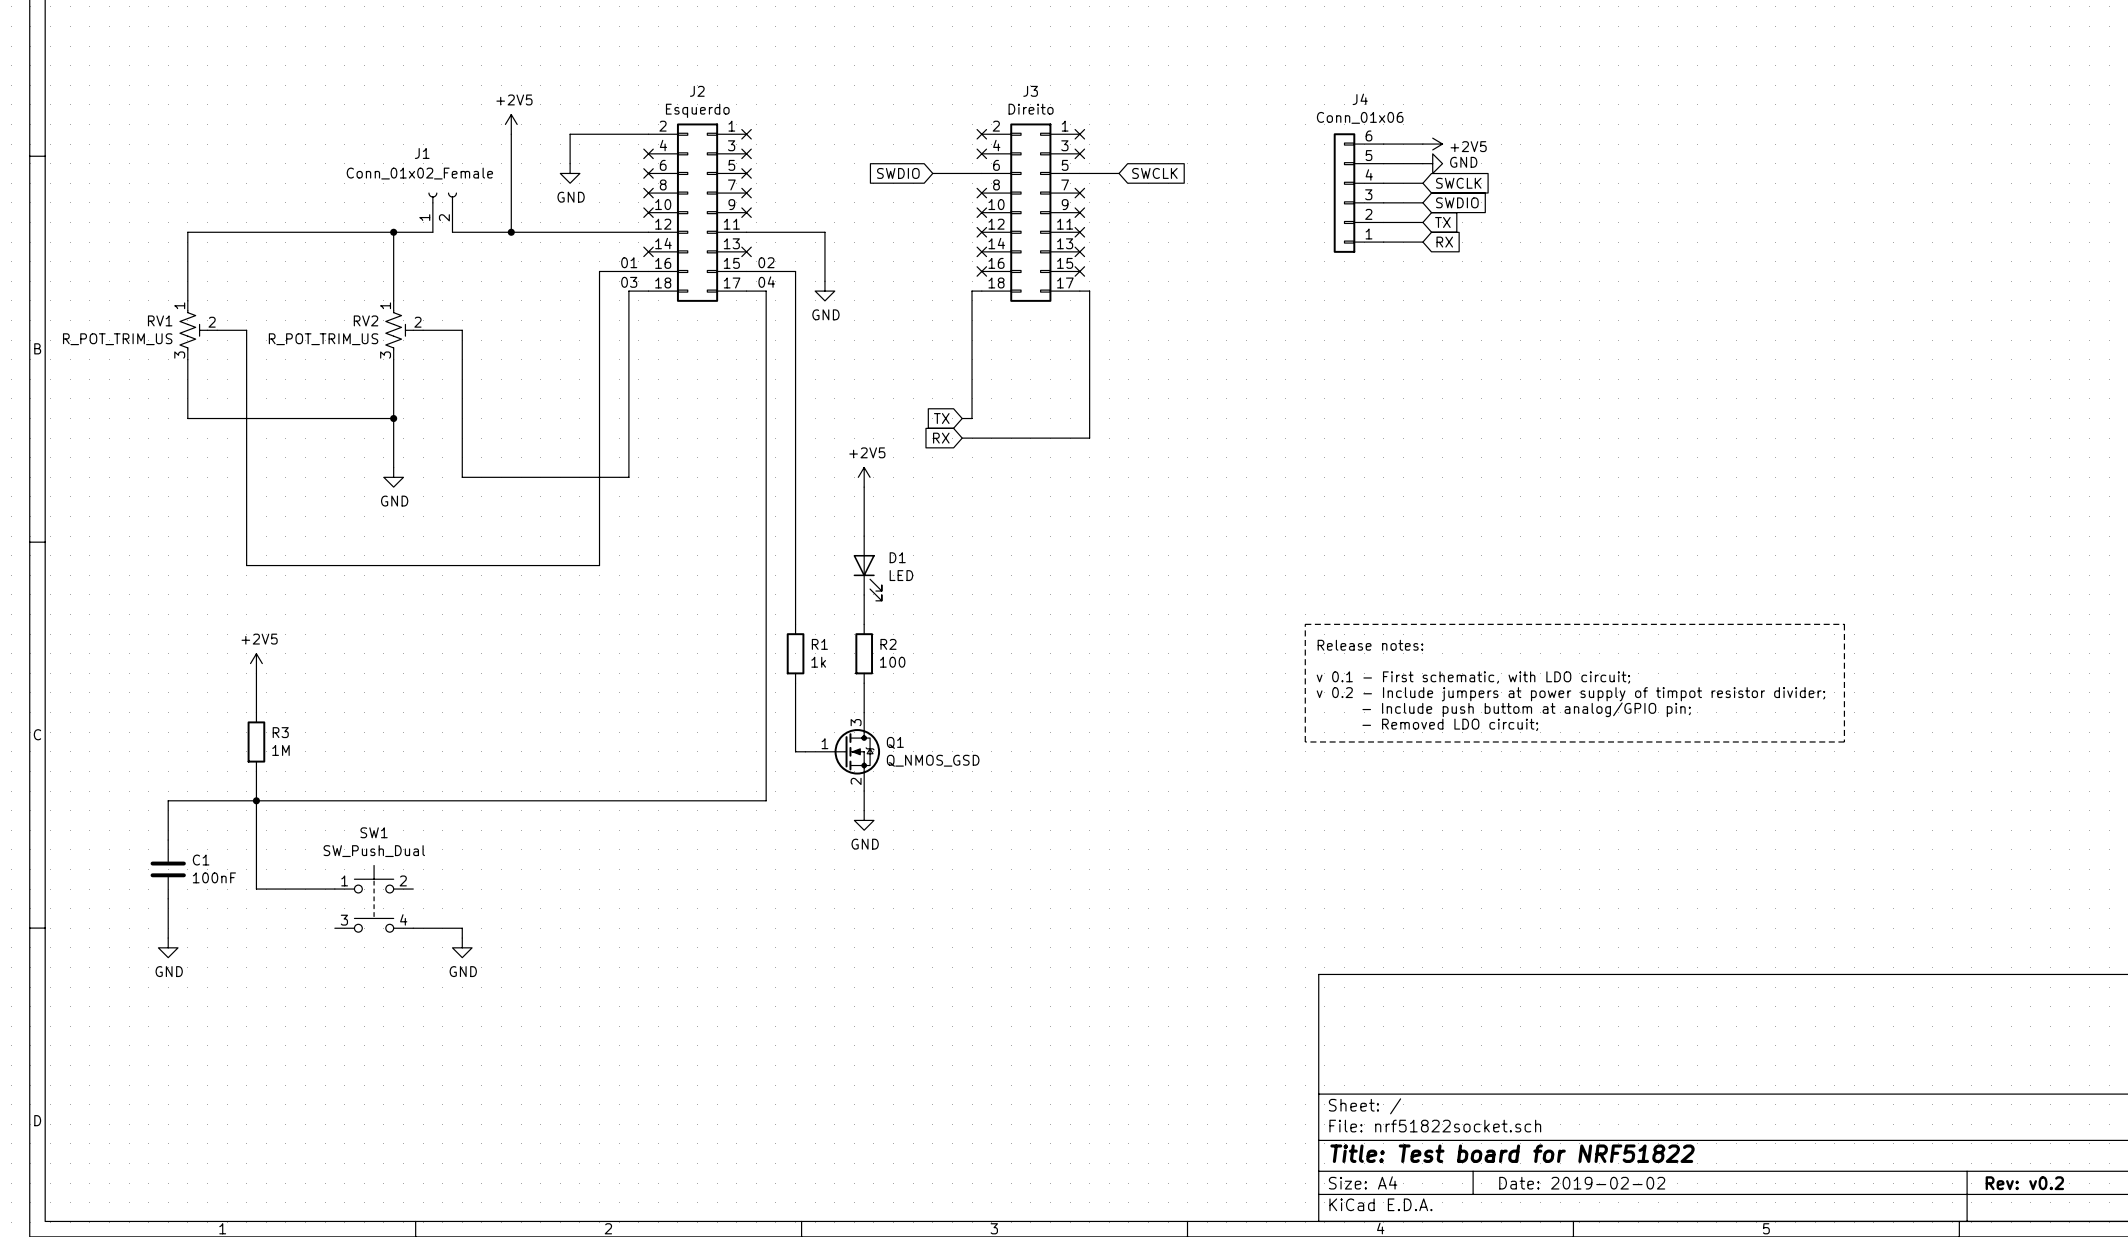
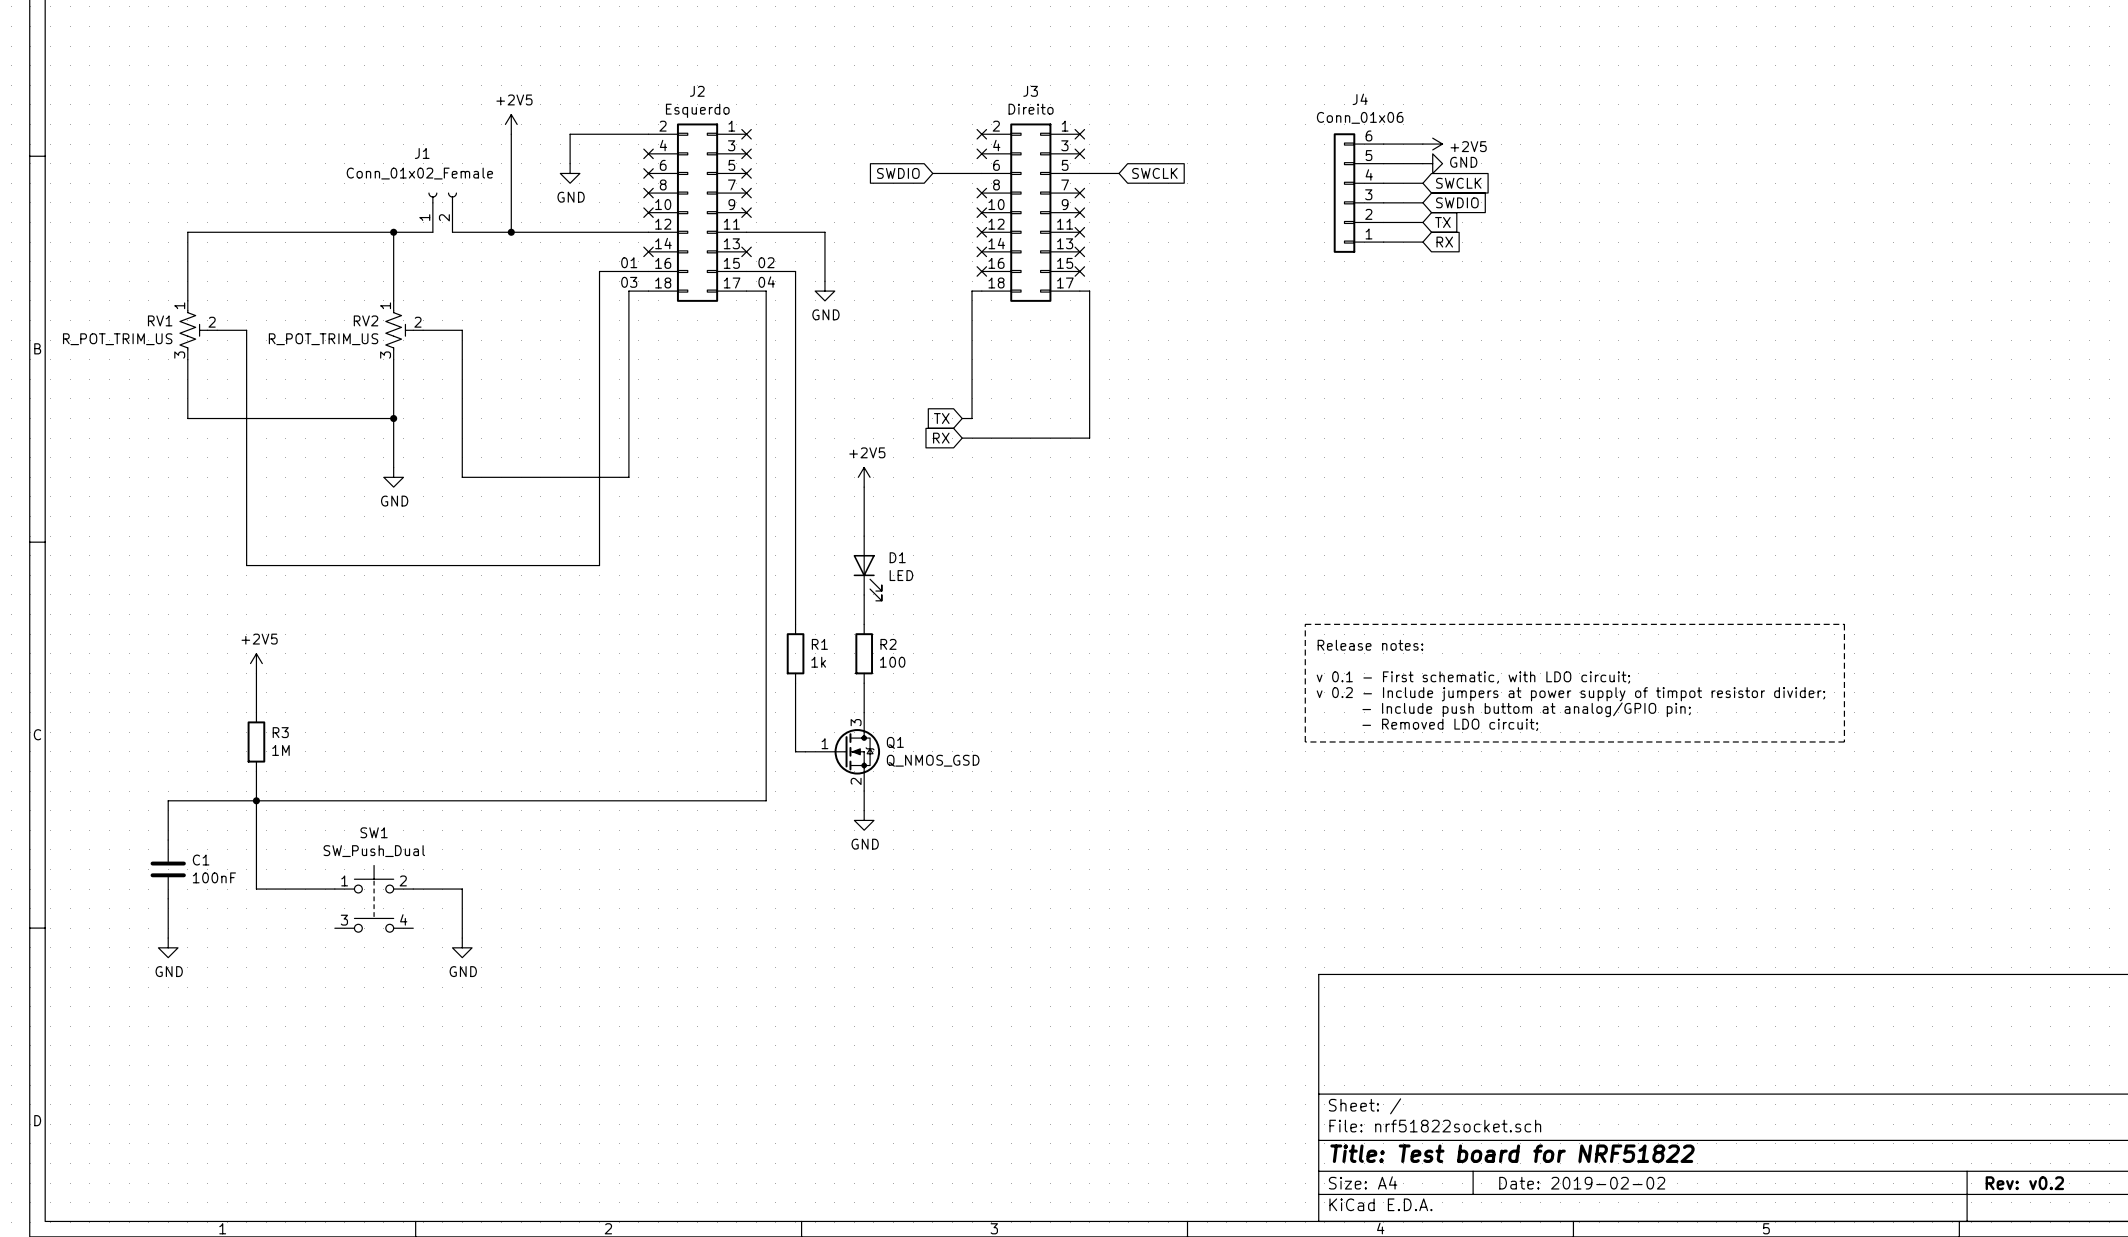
wire: (413, 928) (462, 928) -> (413, 889) (462, 889) (462, 928)

